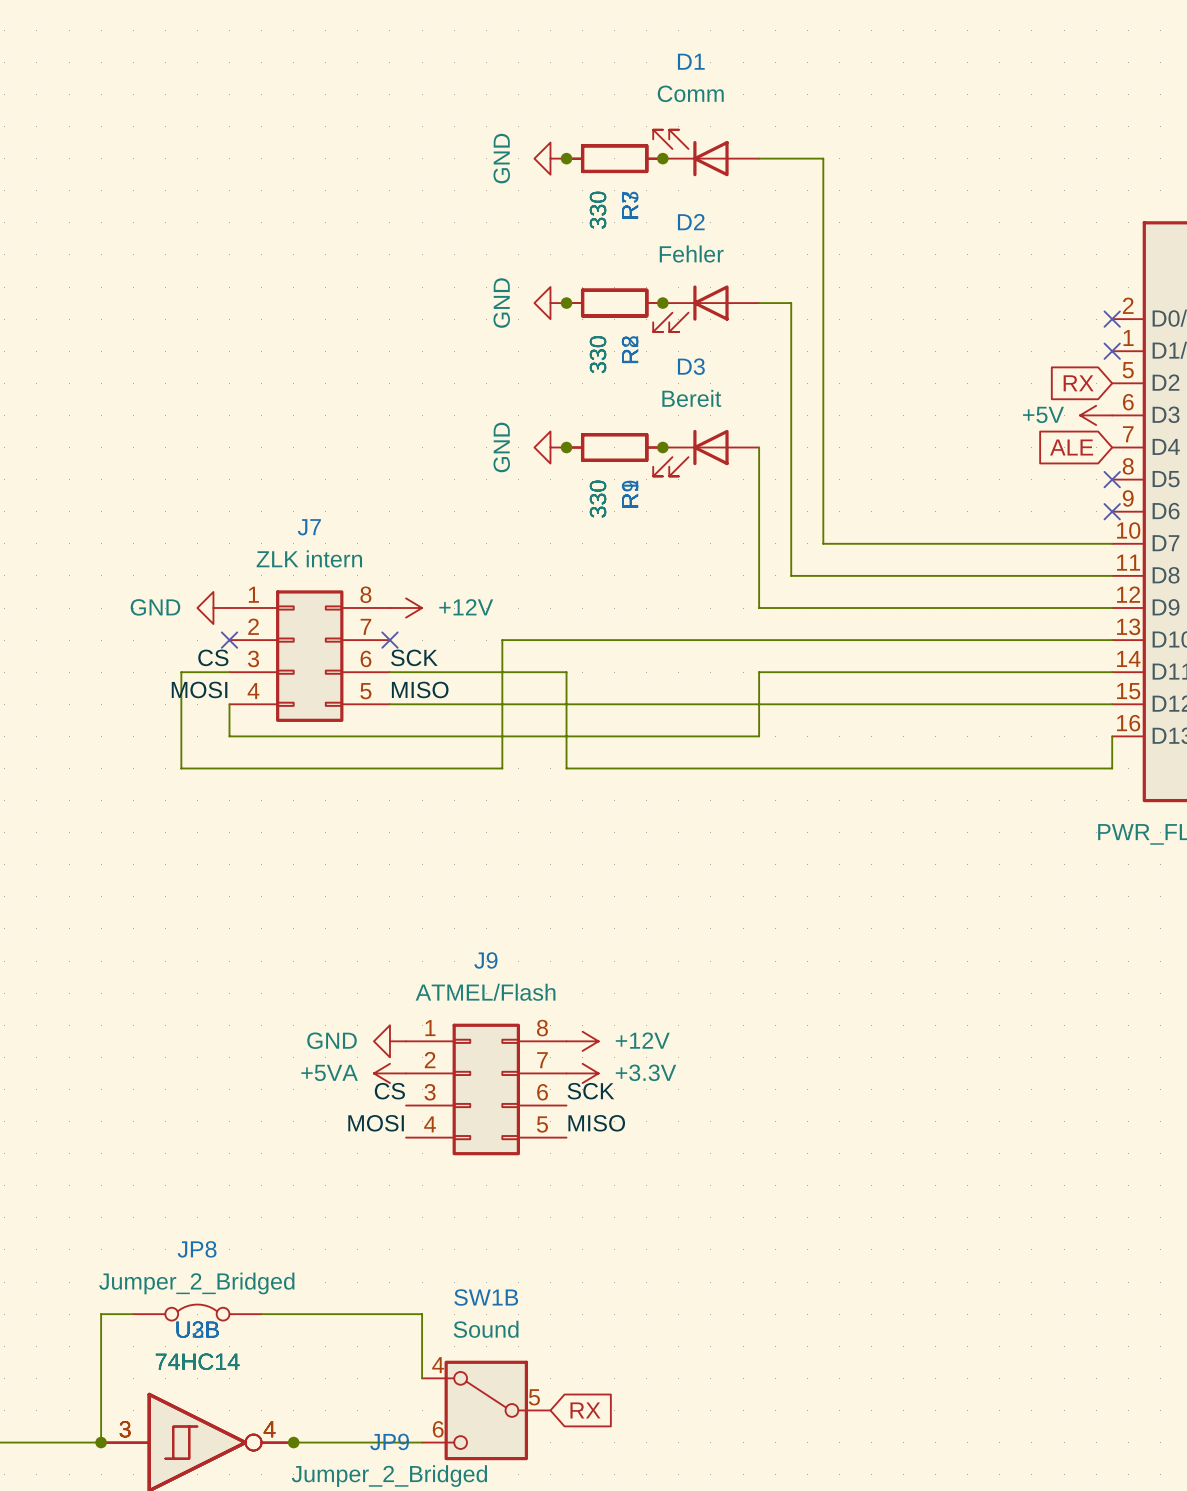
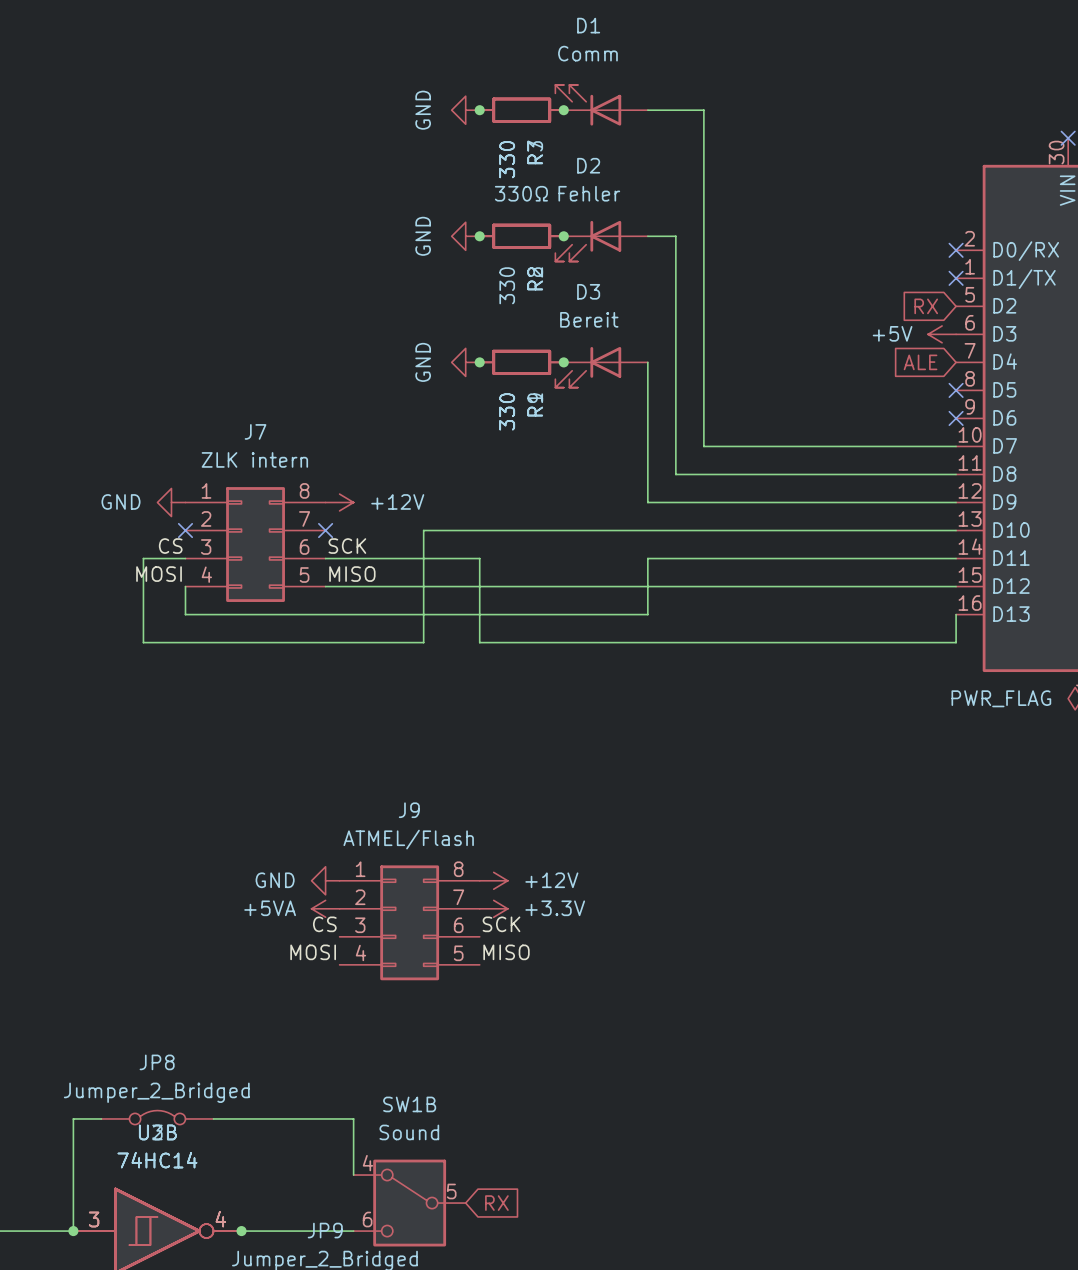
part value: 330 (598, 354) -> 330Ω (521, 193)

